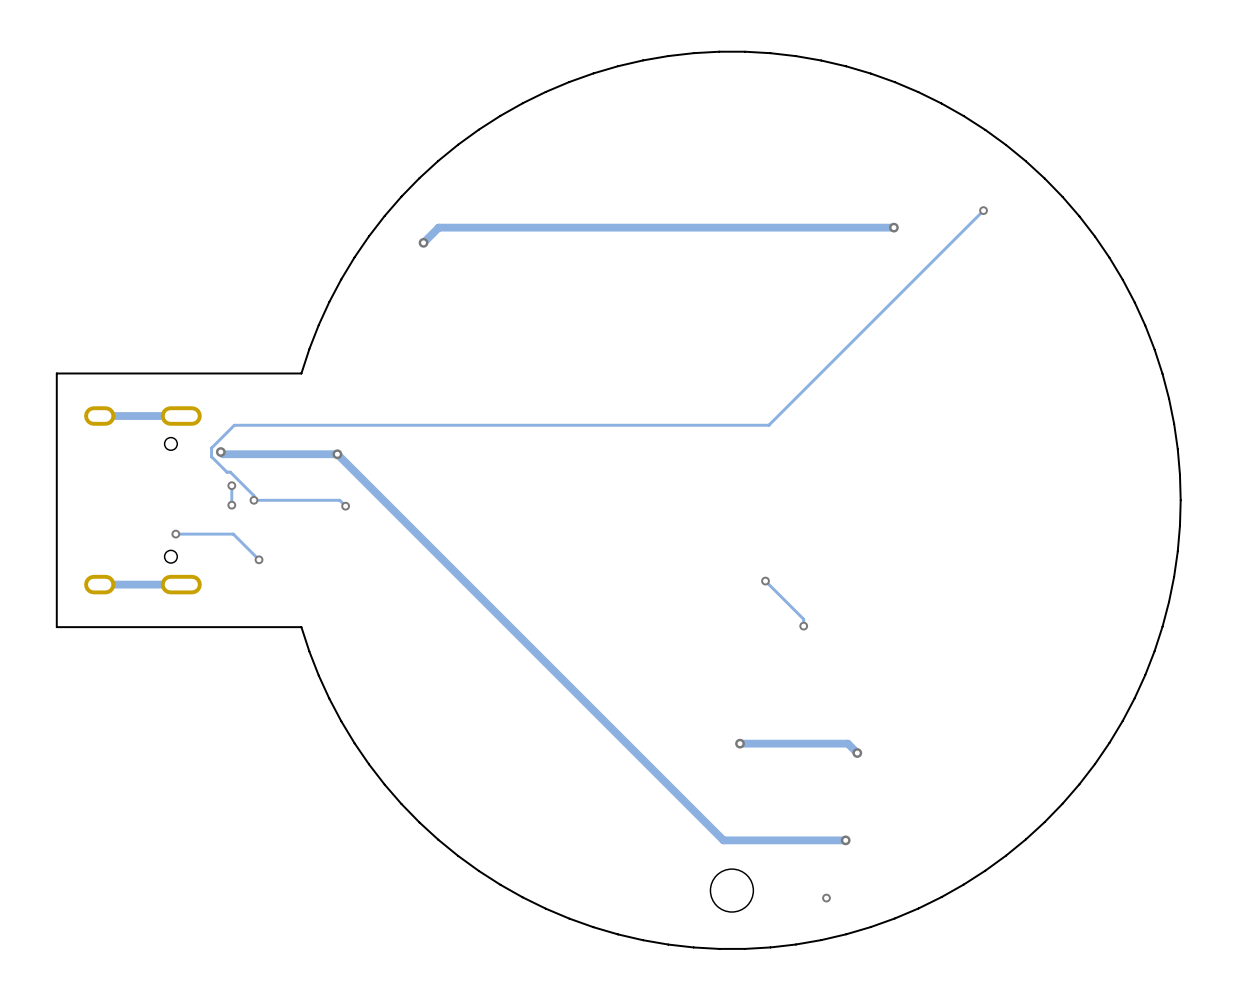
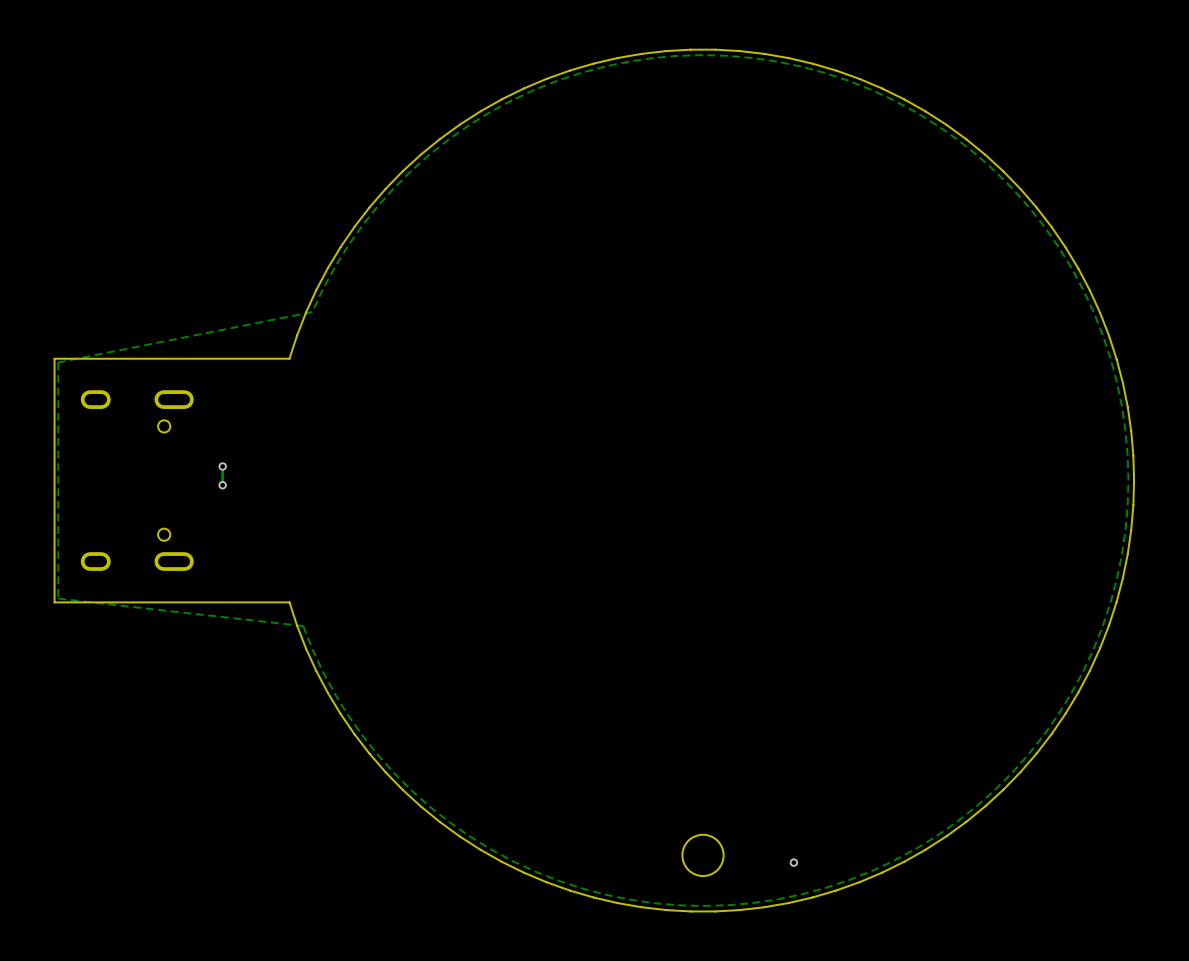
zone outline: none -> (703, 55) (776, 61) (848, 80) (915, 112) (957, 139) (994, 171) (1044, 226) (1071, 267) (1093, 312) (1116, 382) (1125, 431) (1128, 480) (1122, 554) (1102, 626) (1071, 693) (1044, 734) (1012, 772) (957, 821) (915, 849) (871, 871) (801, 894) (752, 903) (703, 906) (629, 899) (557, 880) (490, 849) (448, 821) (411, 790) (361, 734) (334, 693) (303, 626) (58, 598) (58, 362) (312, 312) (334, 267) (377, 207) (411, 171) (469, 125) (534, 89) (581, 72) (653, 57) (703, 55)
track: (983, 210) (768, 425) (234, 425) (211, 448) (211, 456) (253, 495) (253, 500) (339, 500) (345, 506) -> none
via: (983, 210) -> none
track: (893, 227) (438, 227) (423, 242) -> none
via: (893, 227) -> none
via: (423, 242) -> none
track: (181, 416) (99, 416) -> none
track: (220, 452) (223, 454) (337, 454) (723, 840) (845, 840) -> none
via: (220, 452) -> none
via: (337, 454) -> none
via: (253, 500) -> none
via: (345, 506) -> none
track: (175, 534) (233, 534) (259, 559) -> none
via: (175, 534) -> none
via: (259, 559) -> none
track: (765, 581) (803, 619) (803, 626) -> none
via: (765, 581) -> none
track: (181, 584) (99, 584) -> none
via: (803, 626) -> none
track: (740, 743) (847, 743) (857, 753) -> none
via: (740, 743) -> none
via: (857, 753) -> none
via: (845, 840) -> none

